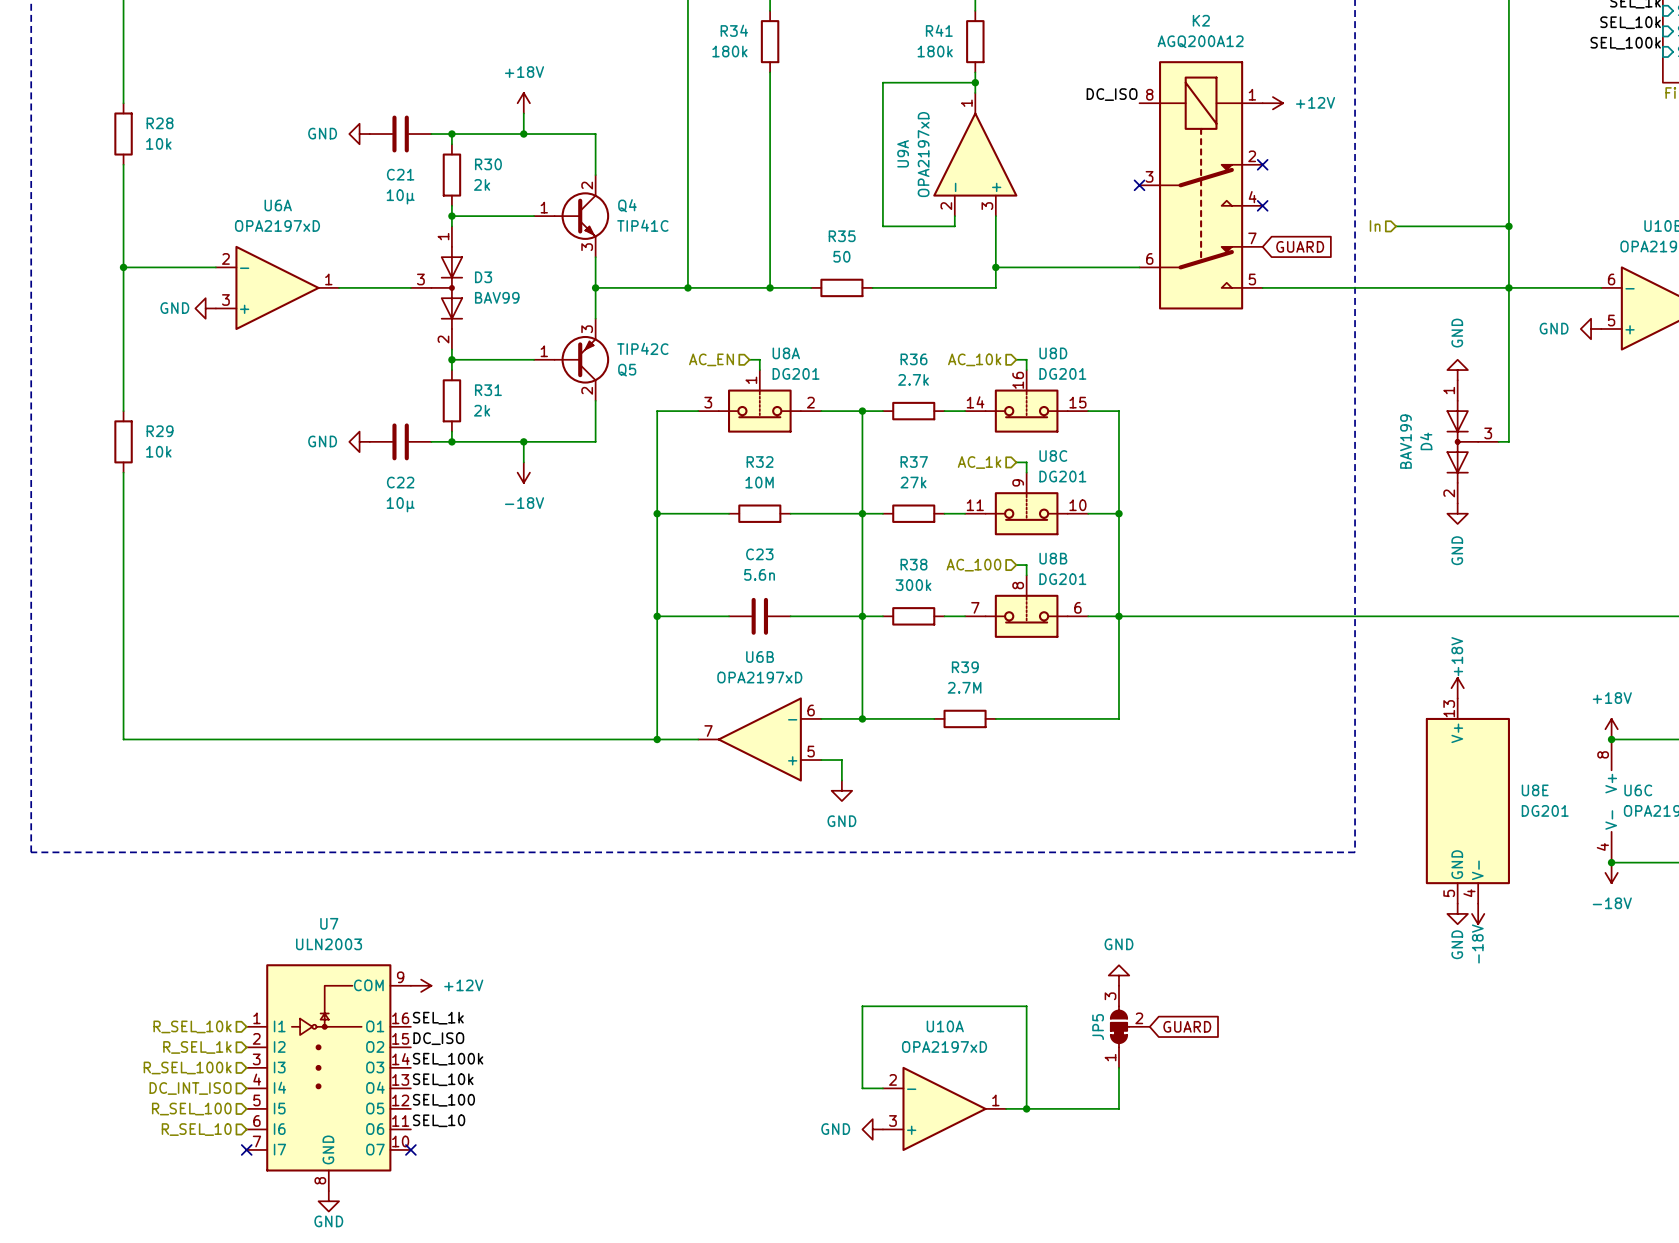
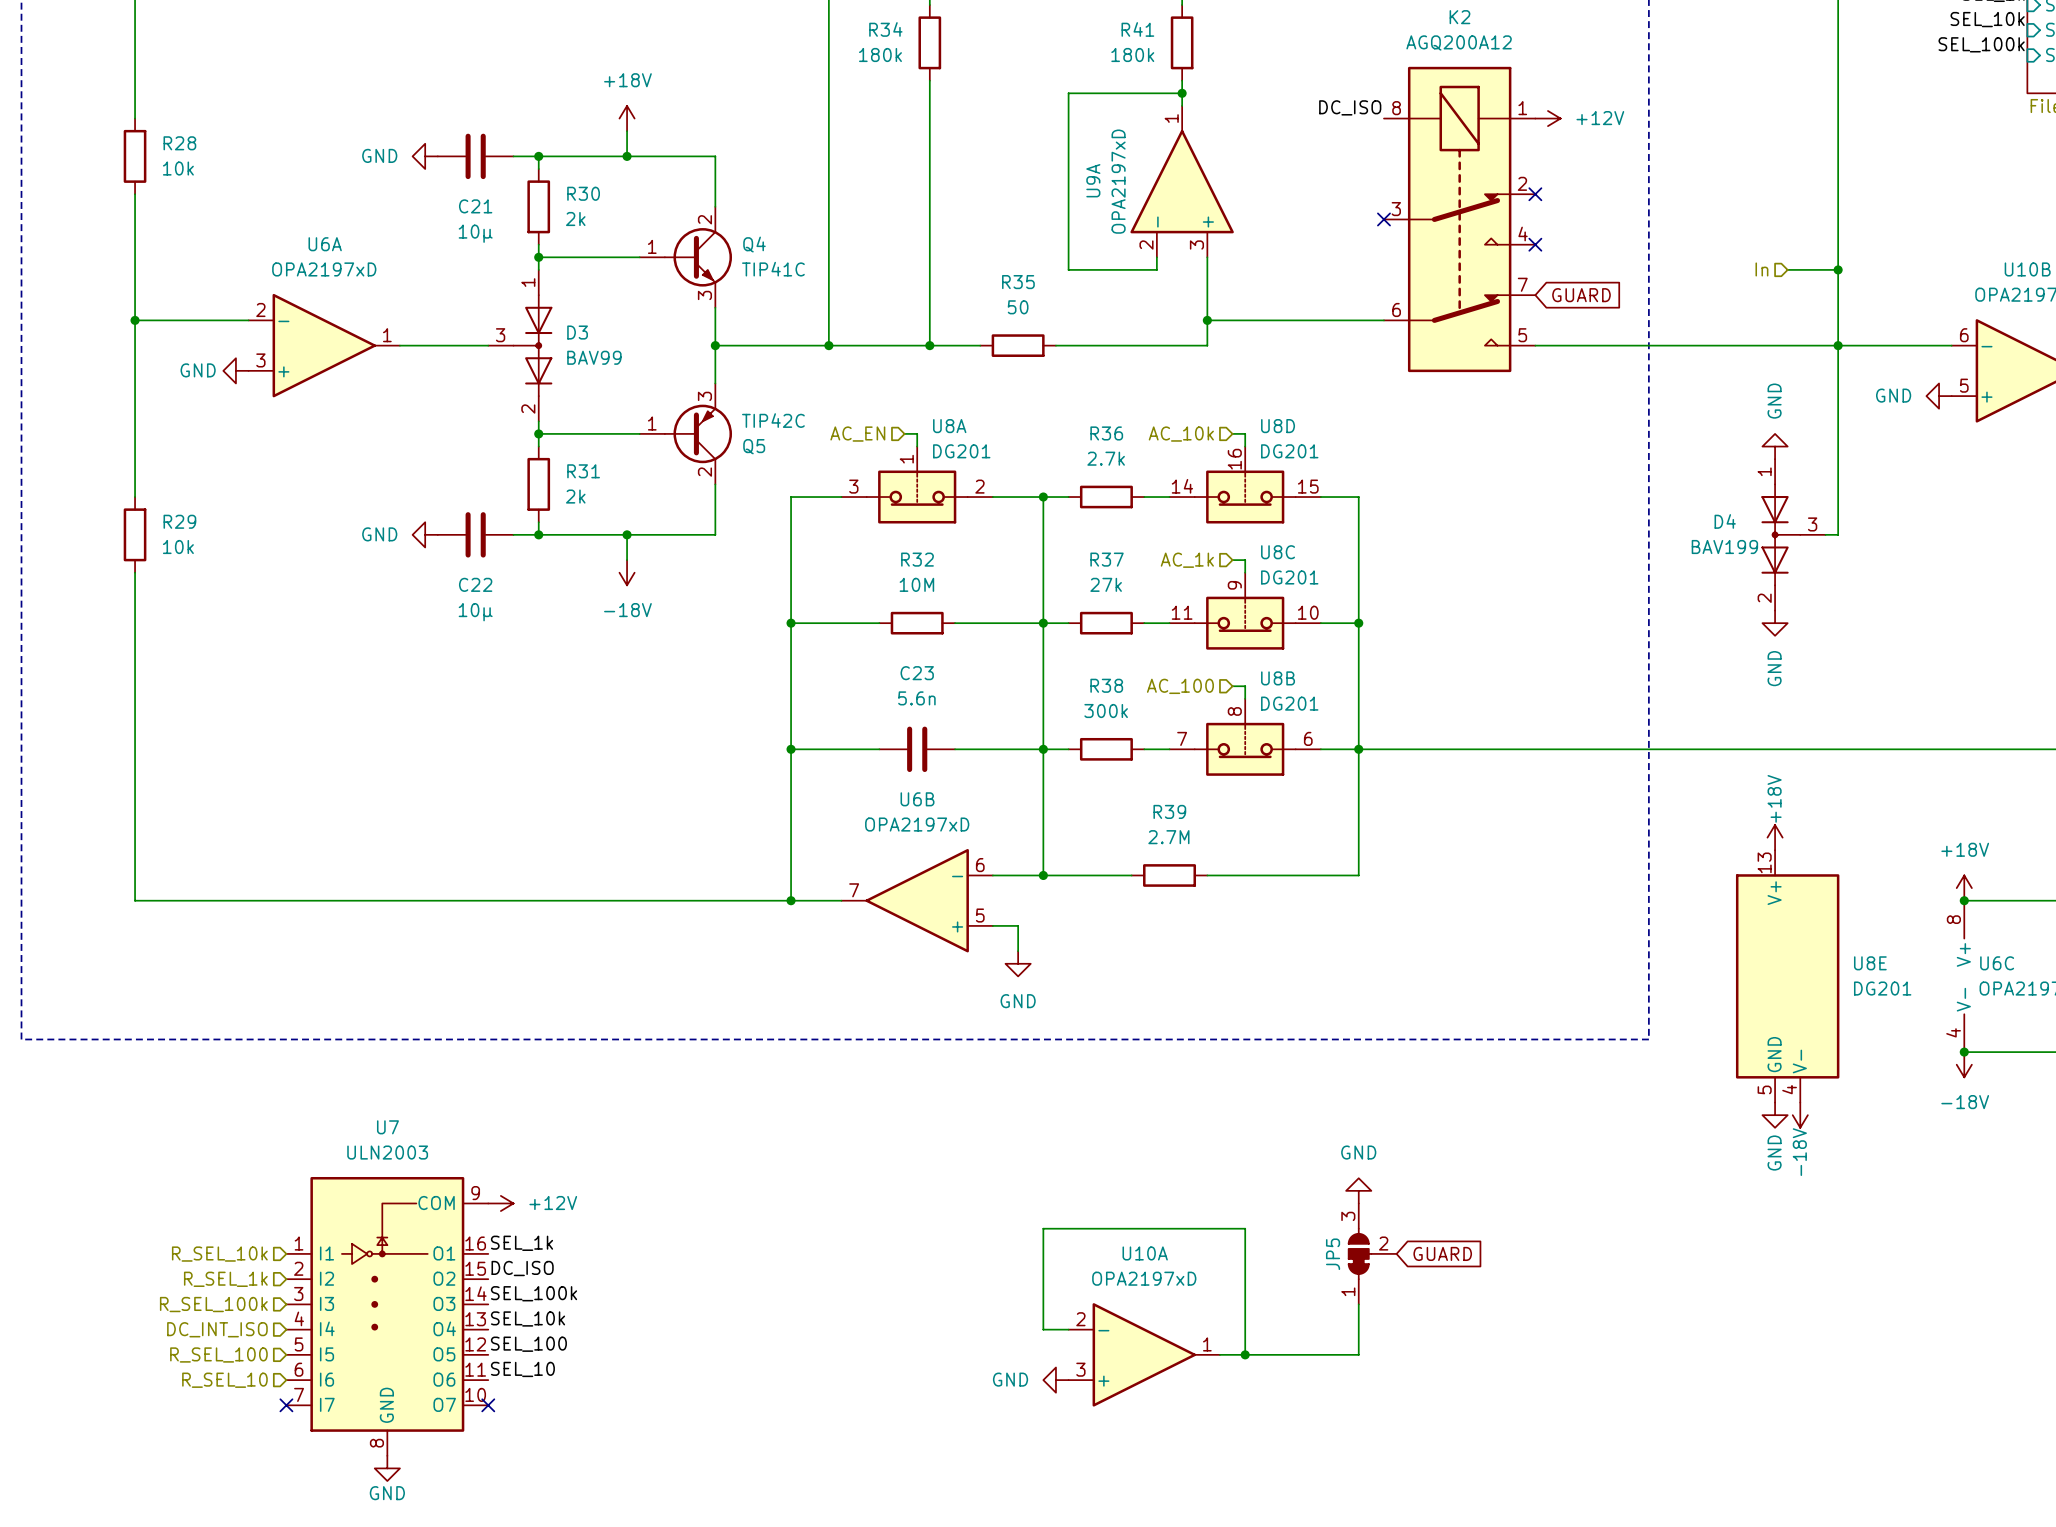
hierarchical label position: In (1375, 225) -> In (1761, 269)
wire: (1396, 226) (1467, 226) -> none
D4 value rotation: 0° (1405, 441) -> 90° clockwise (1724, 547)
D4 name rotation: 0° (1426, 441) -> 90° clockwise (1725, 521)

